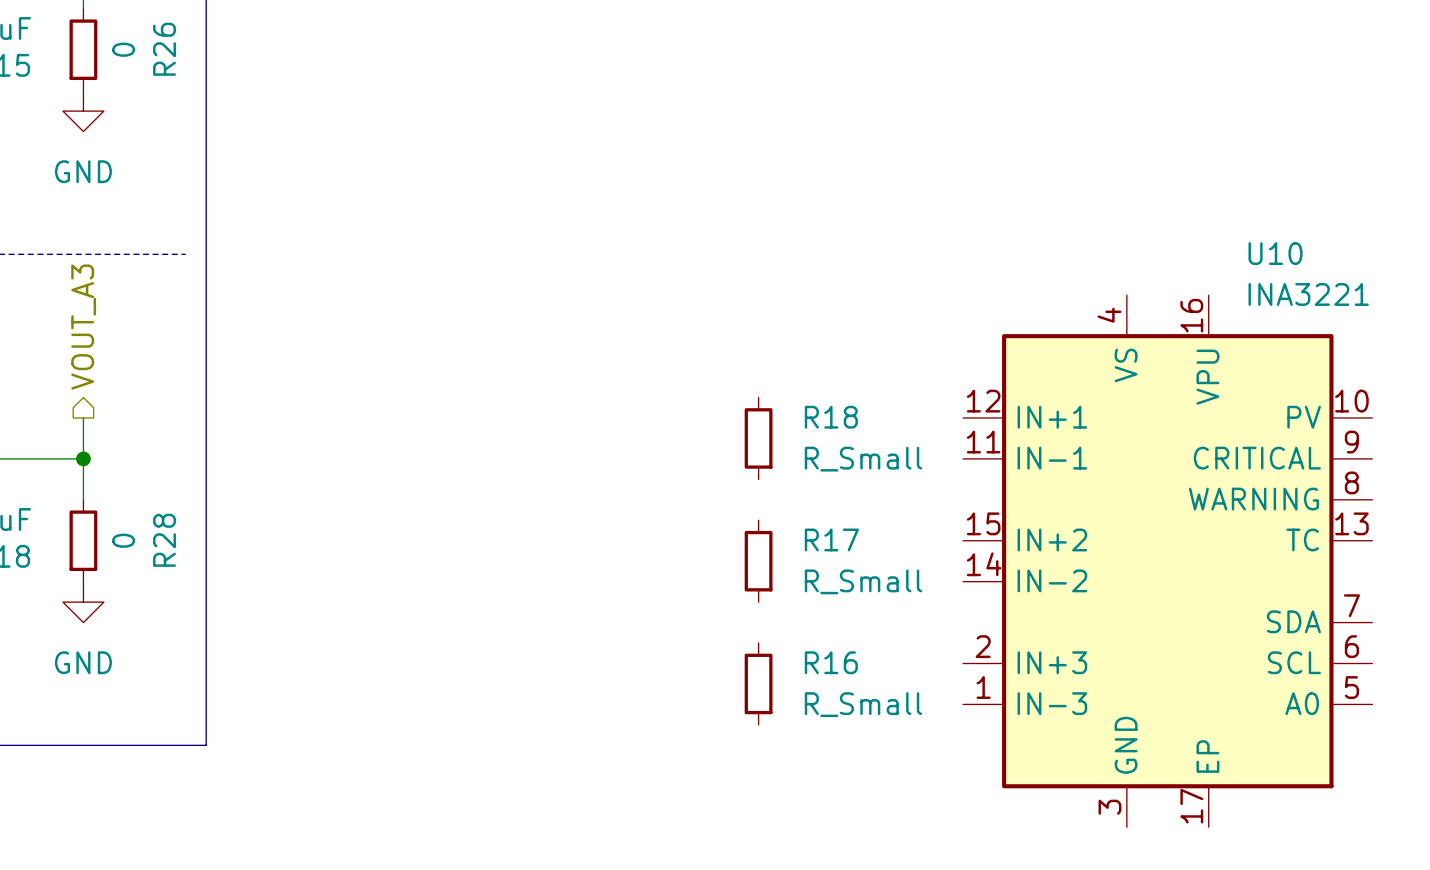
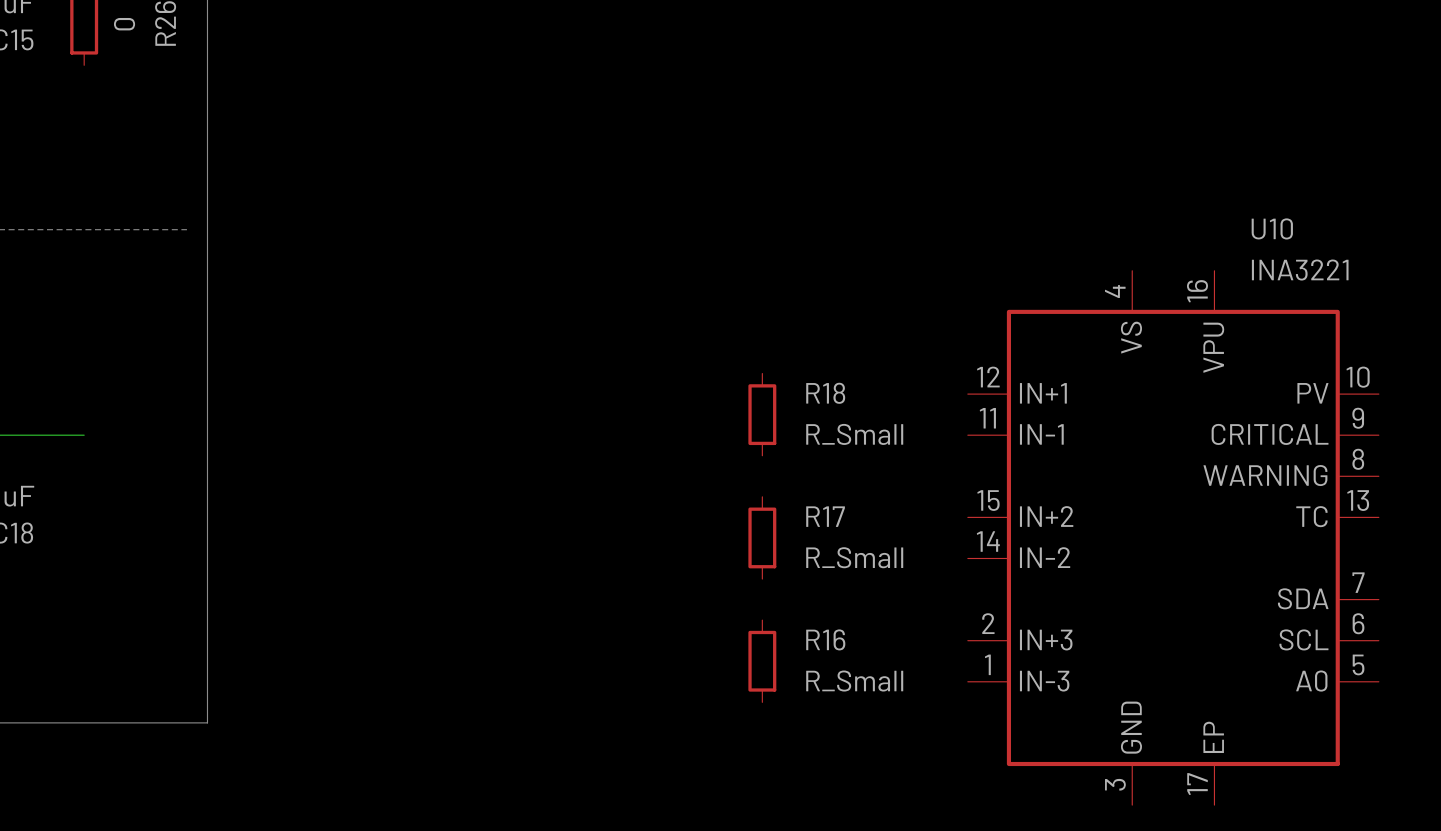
power symbol: GND (83, 111) -> none
hierarchical label: VOUT_A3 (83, 327) -> none
wire: (83, 417) (83, 499) -> none
junction: (83, 458) -> none
R28: 0 (83, 540) -> none
power symbol: GND (83, 602) -> none

